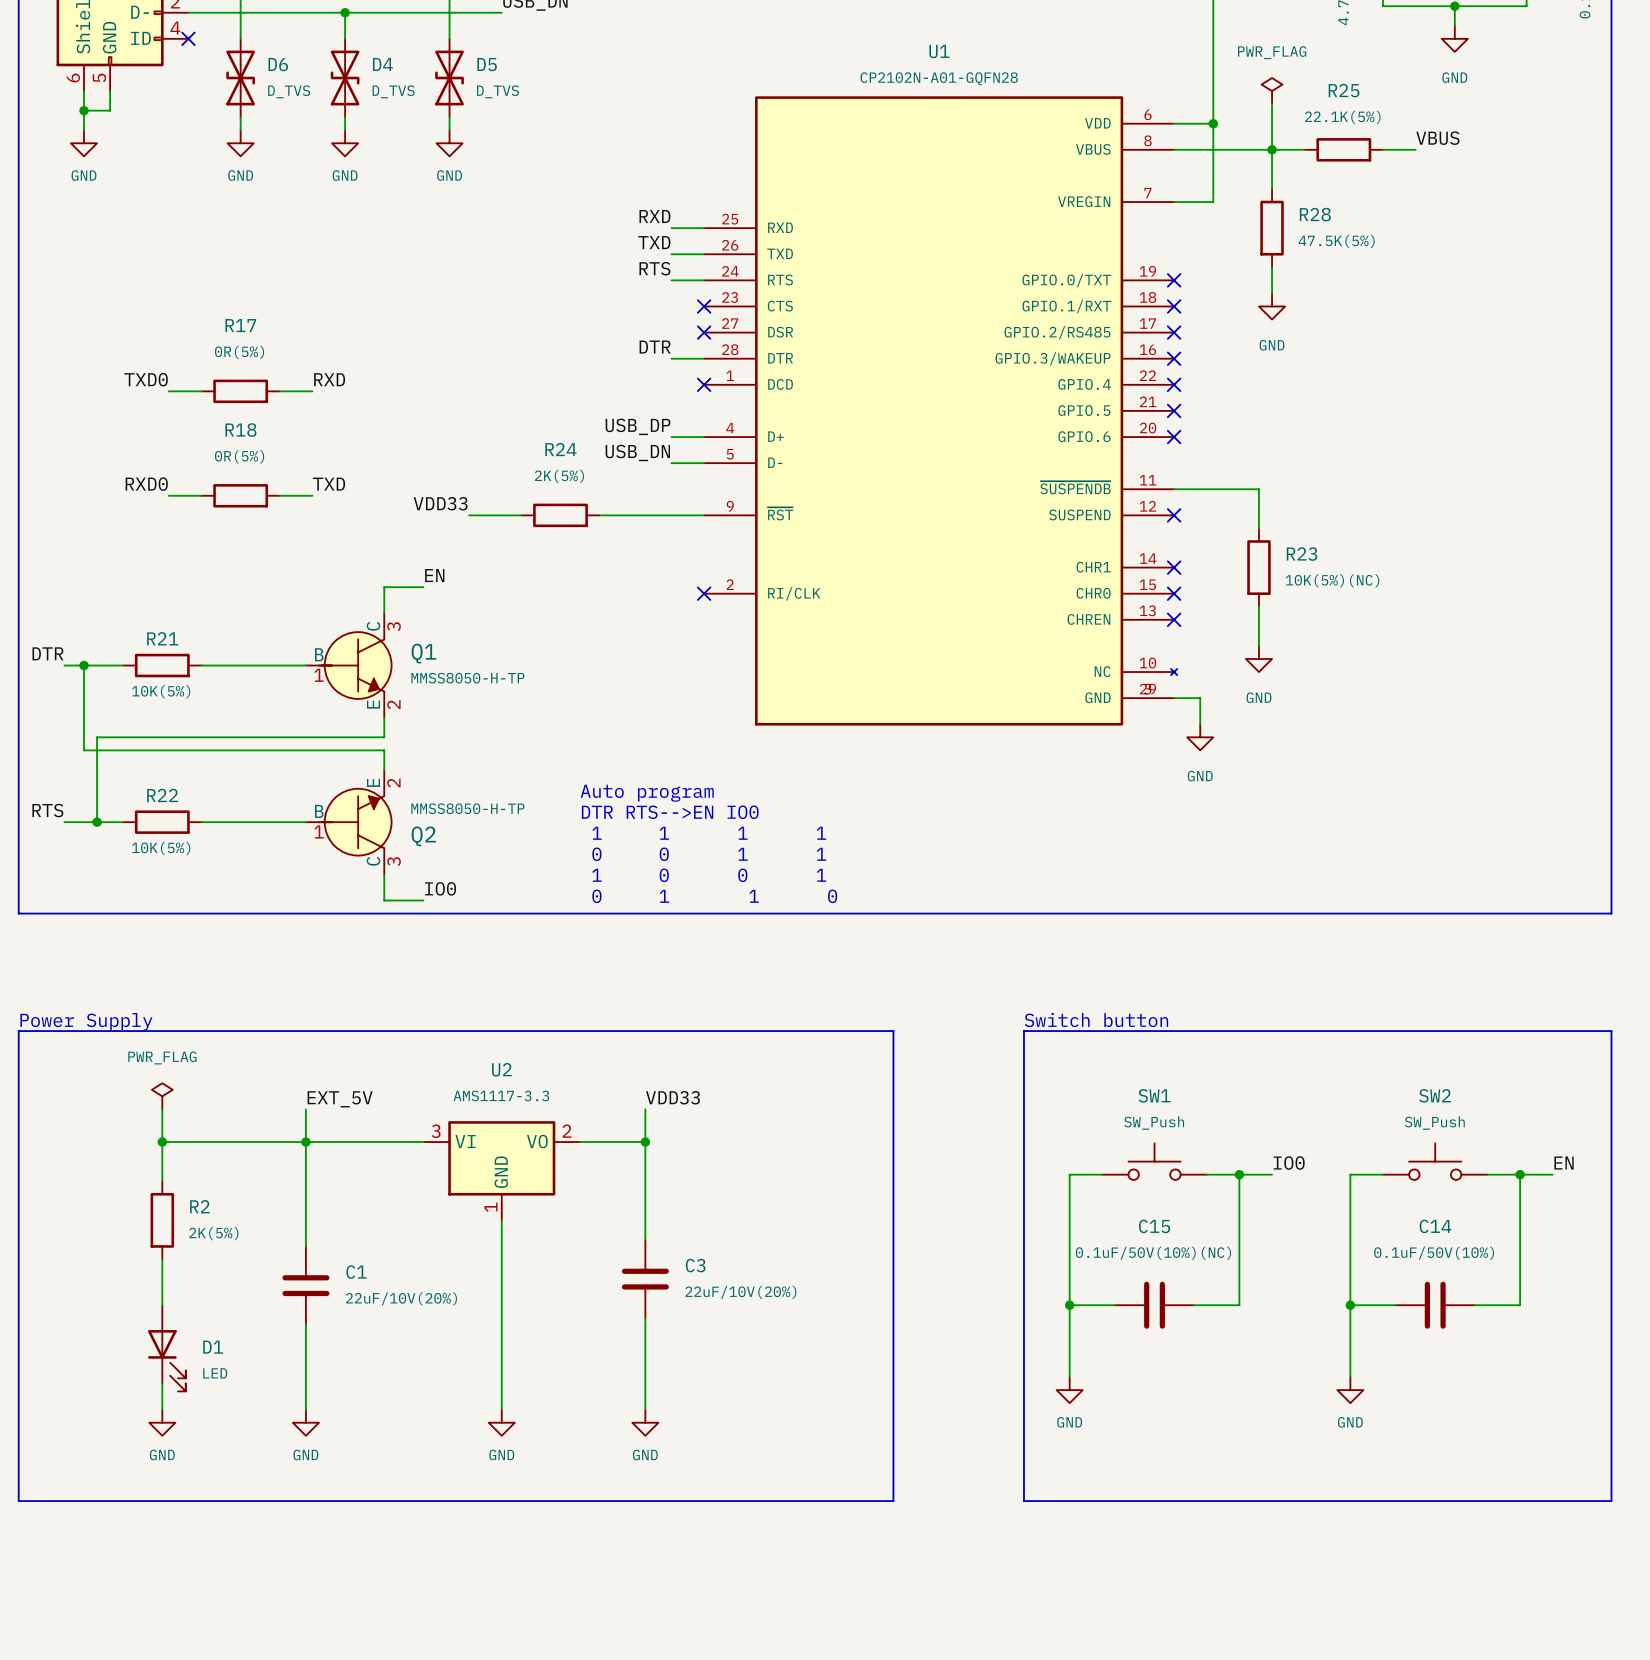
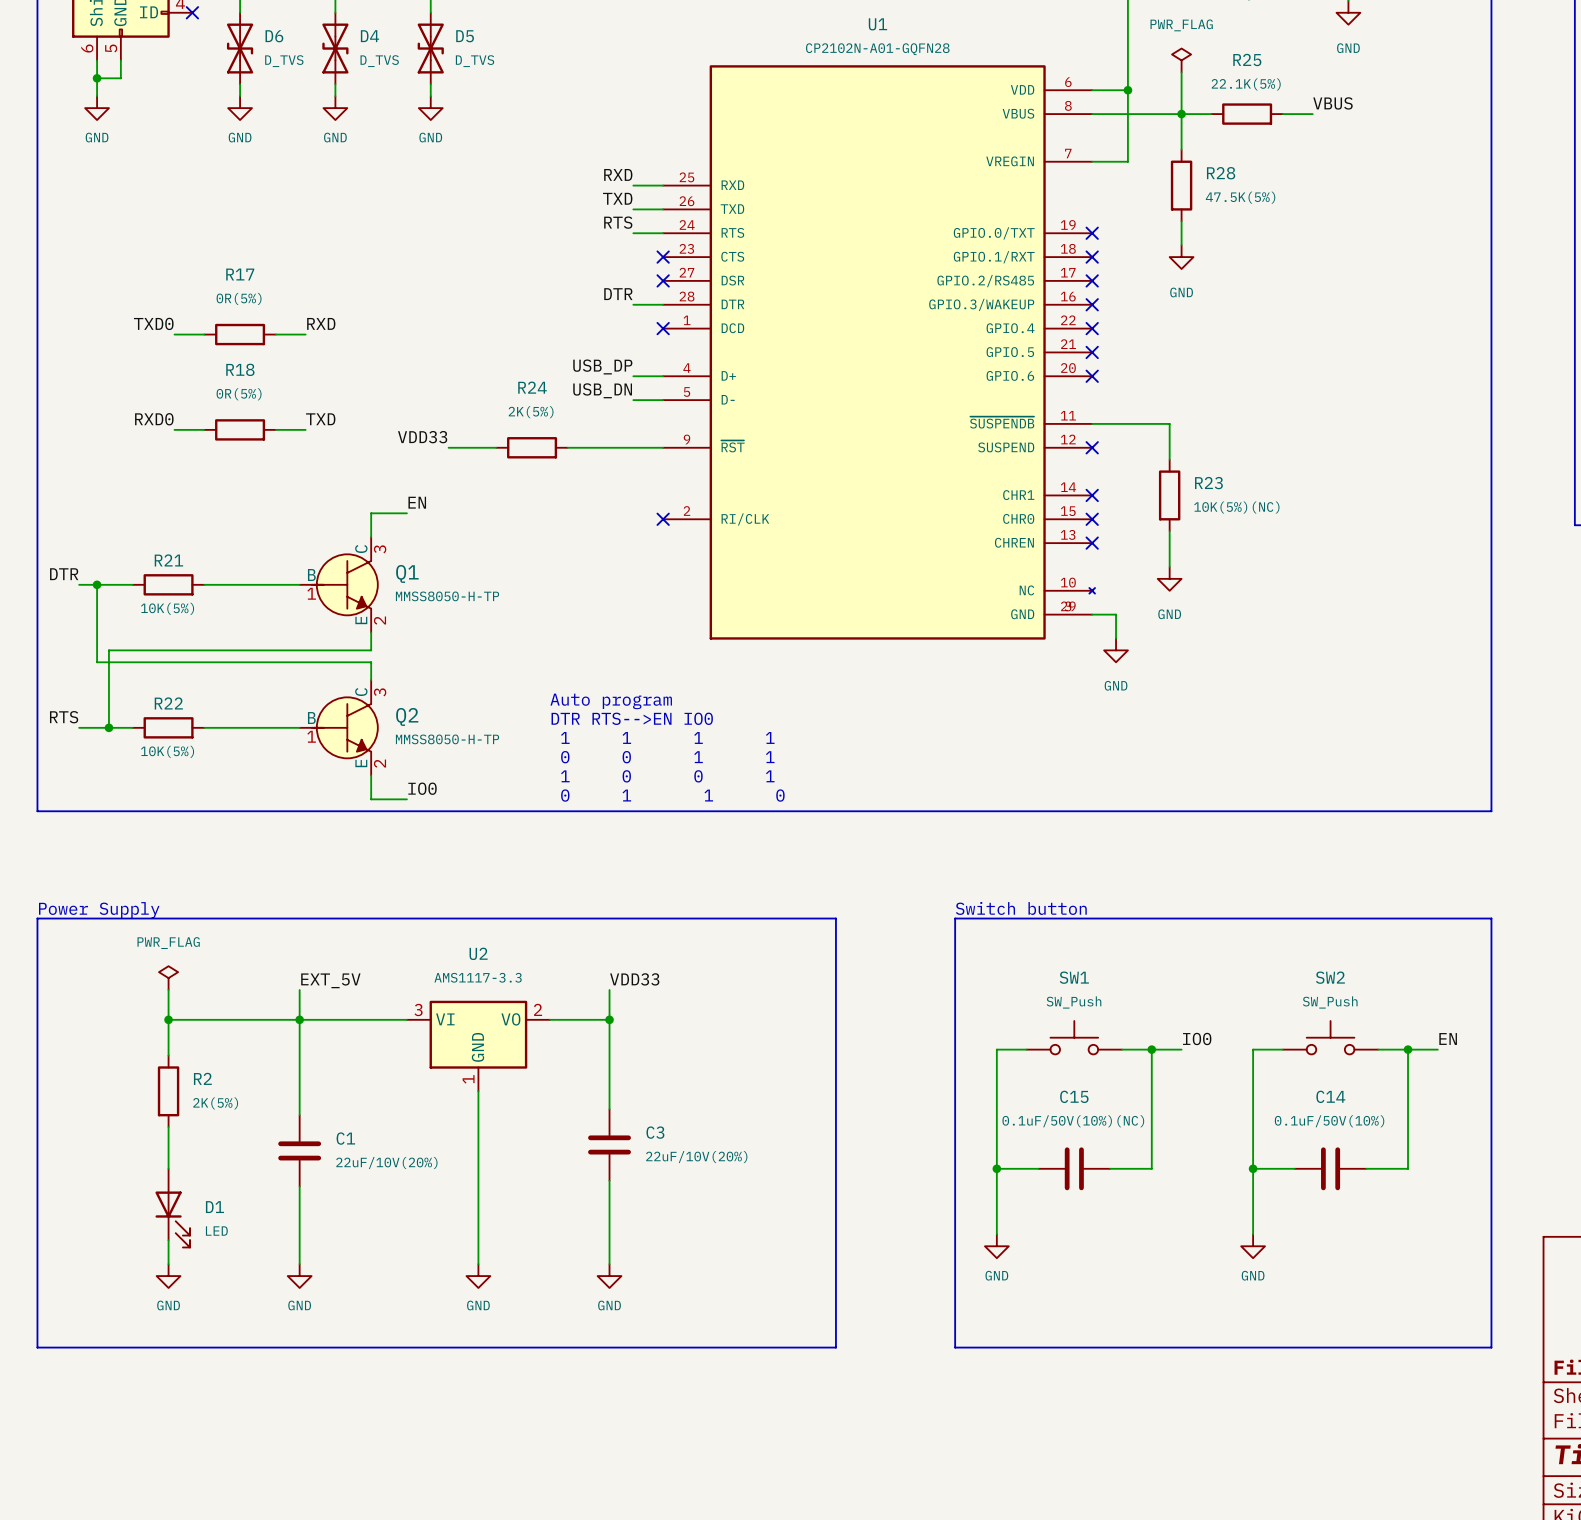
Q2 flip: as is (355, 822) -> up-down (344, 727)

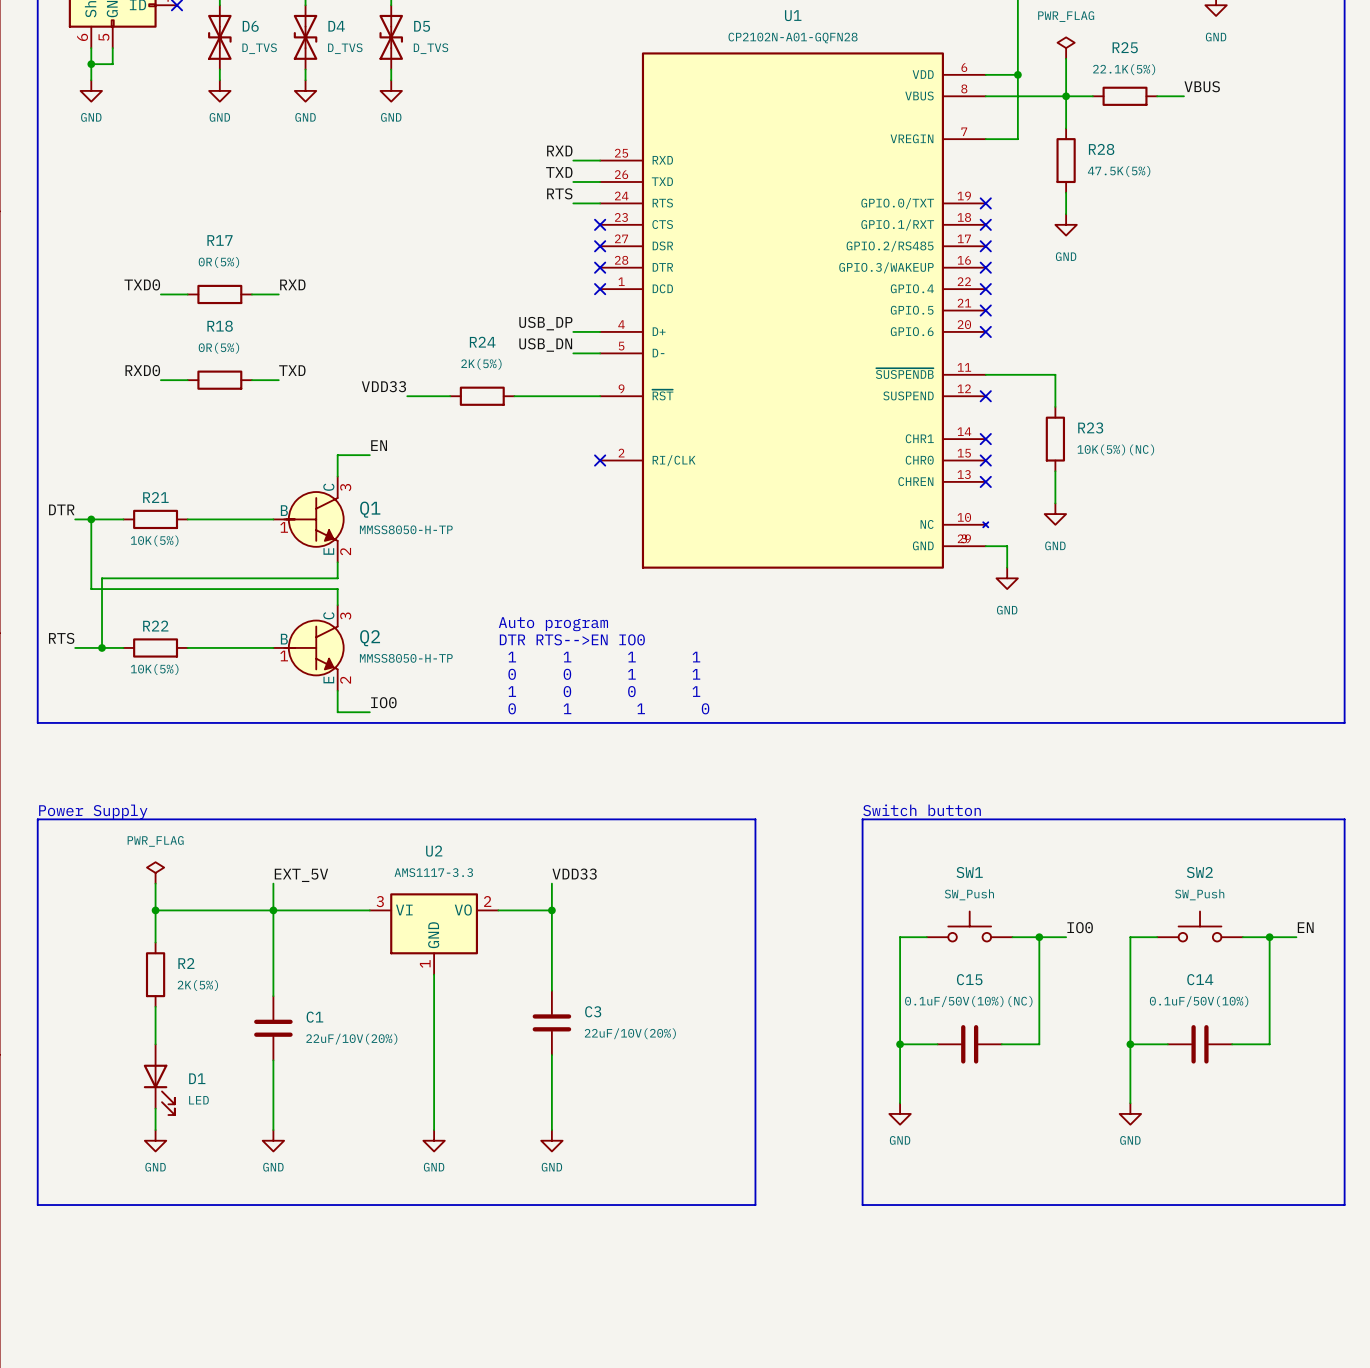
label: DTR (618, 294) -> none
wire: (633, 304) (663, 304) -> none
no-connect mark: none -> (600, 267)

